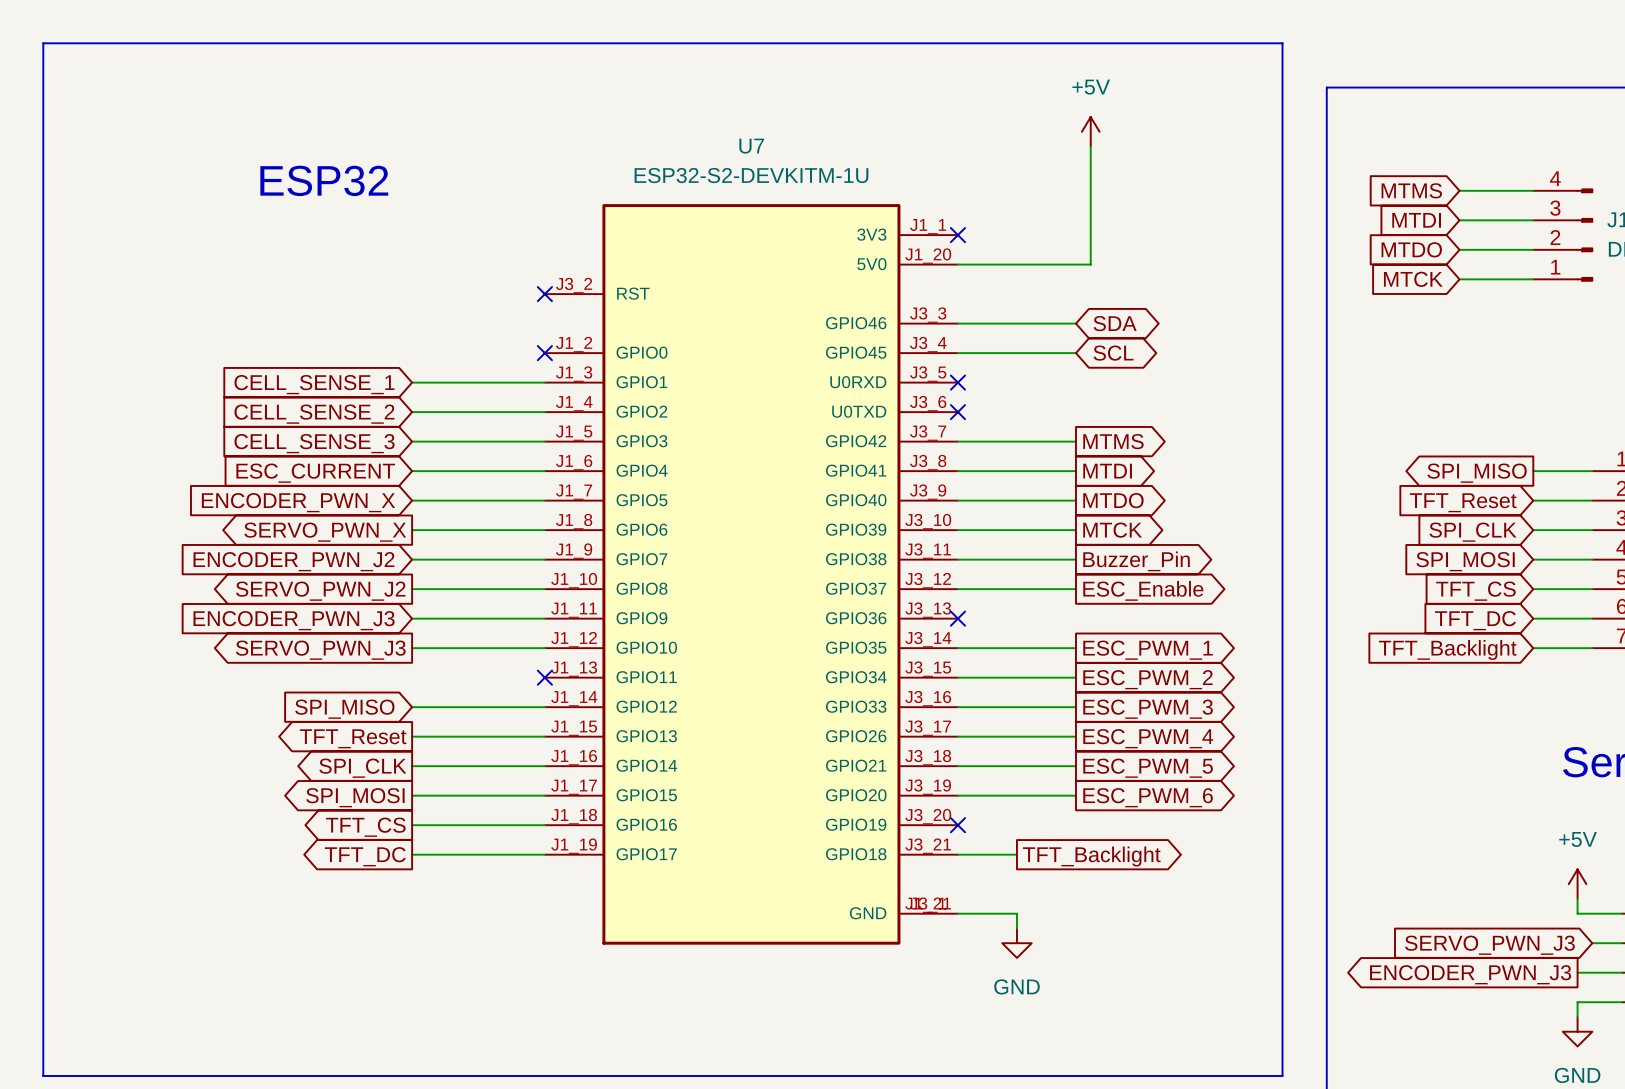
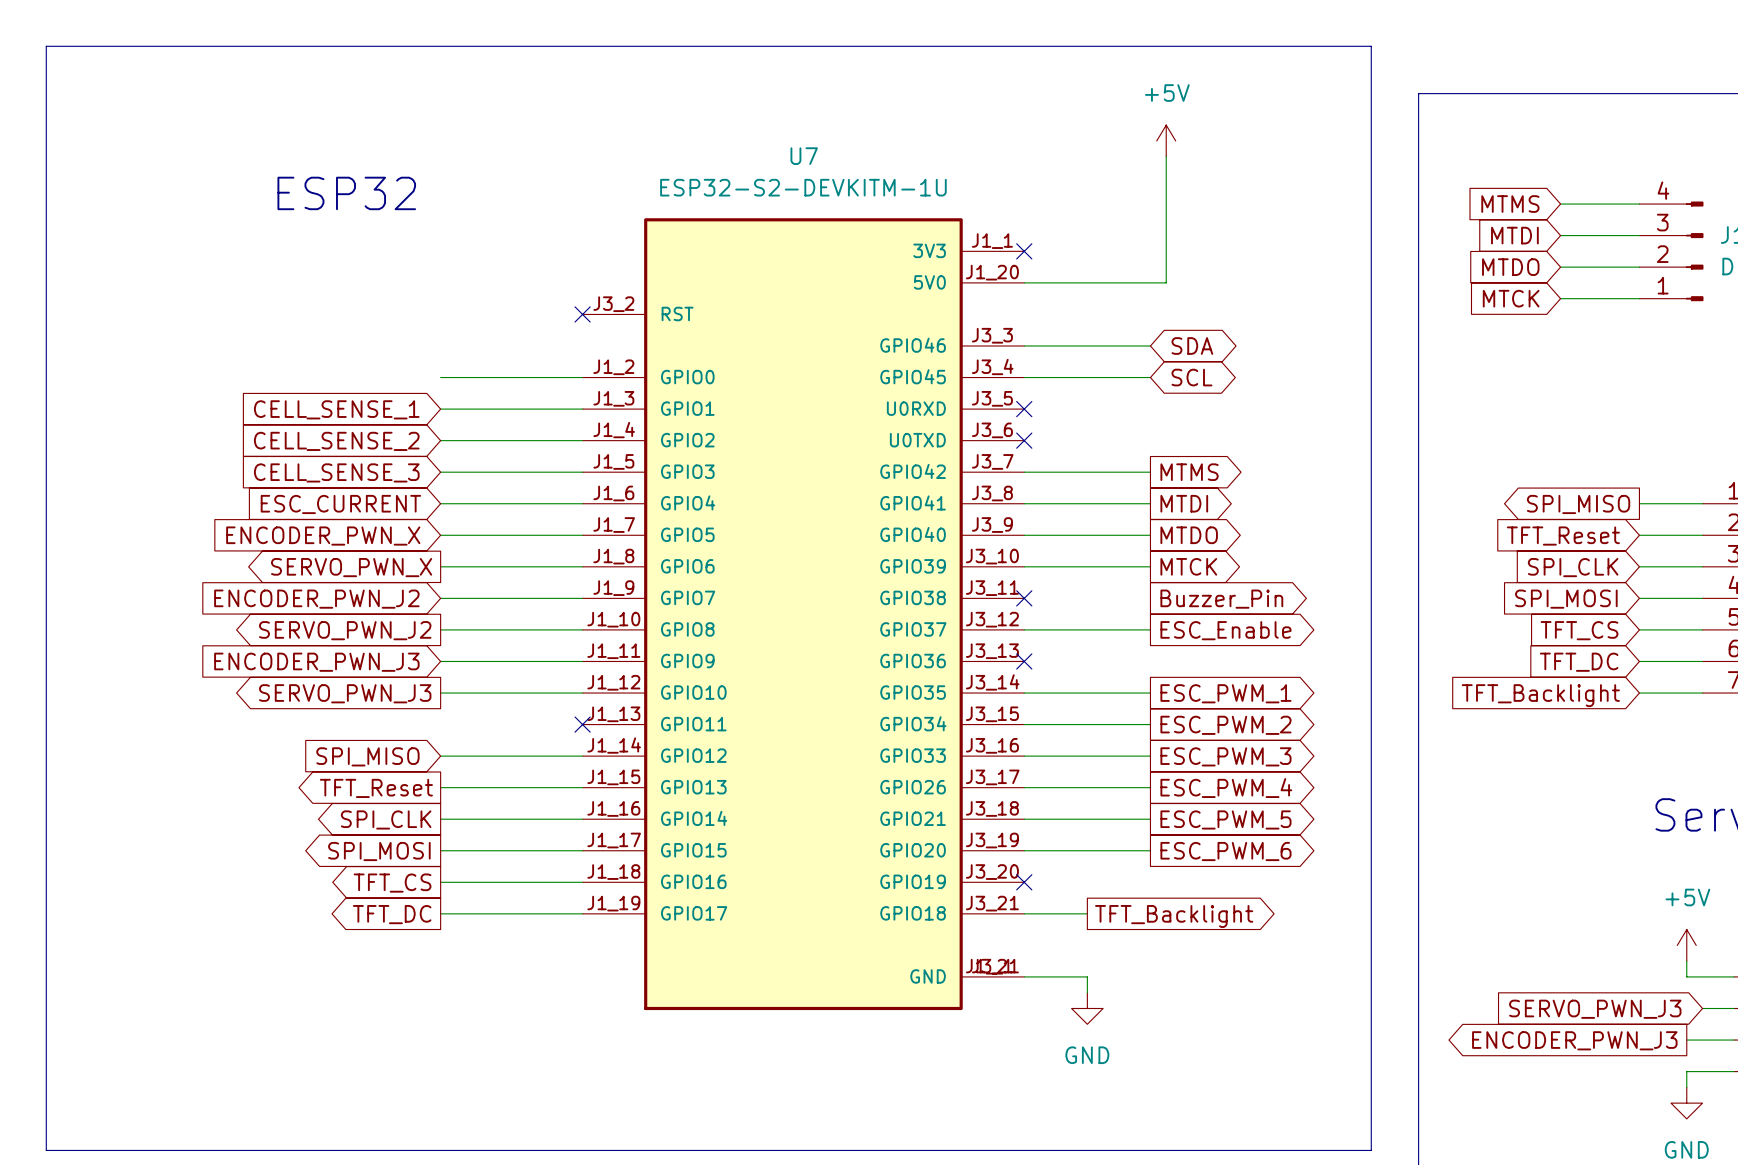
wire: none -> (440, 377) (582, 377)
no-connect mark: (544, 353) -> none
wire: (957, 559) (1075, 559) -> none
no-connect mark: none -> (1024, 598)

